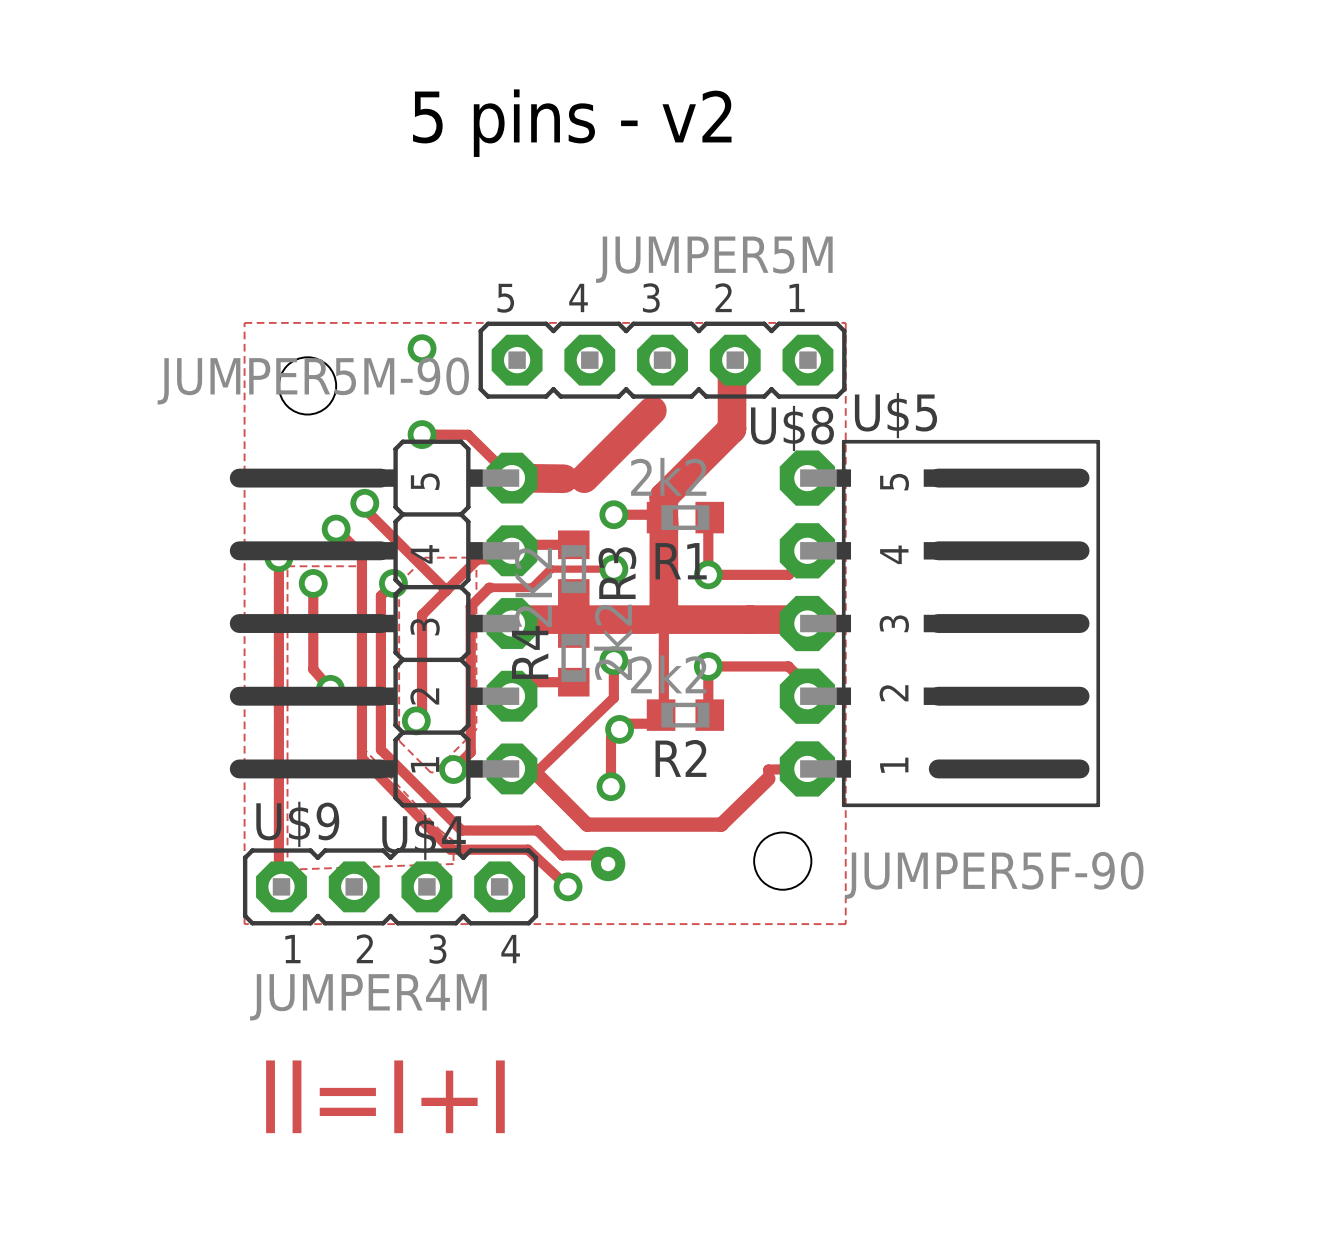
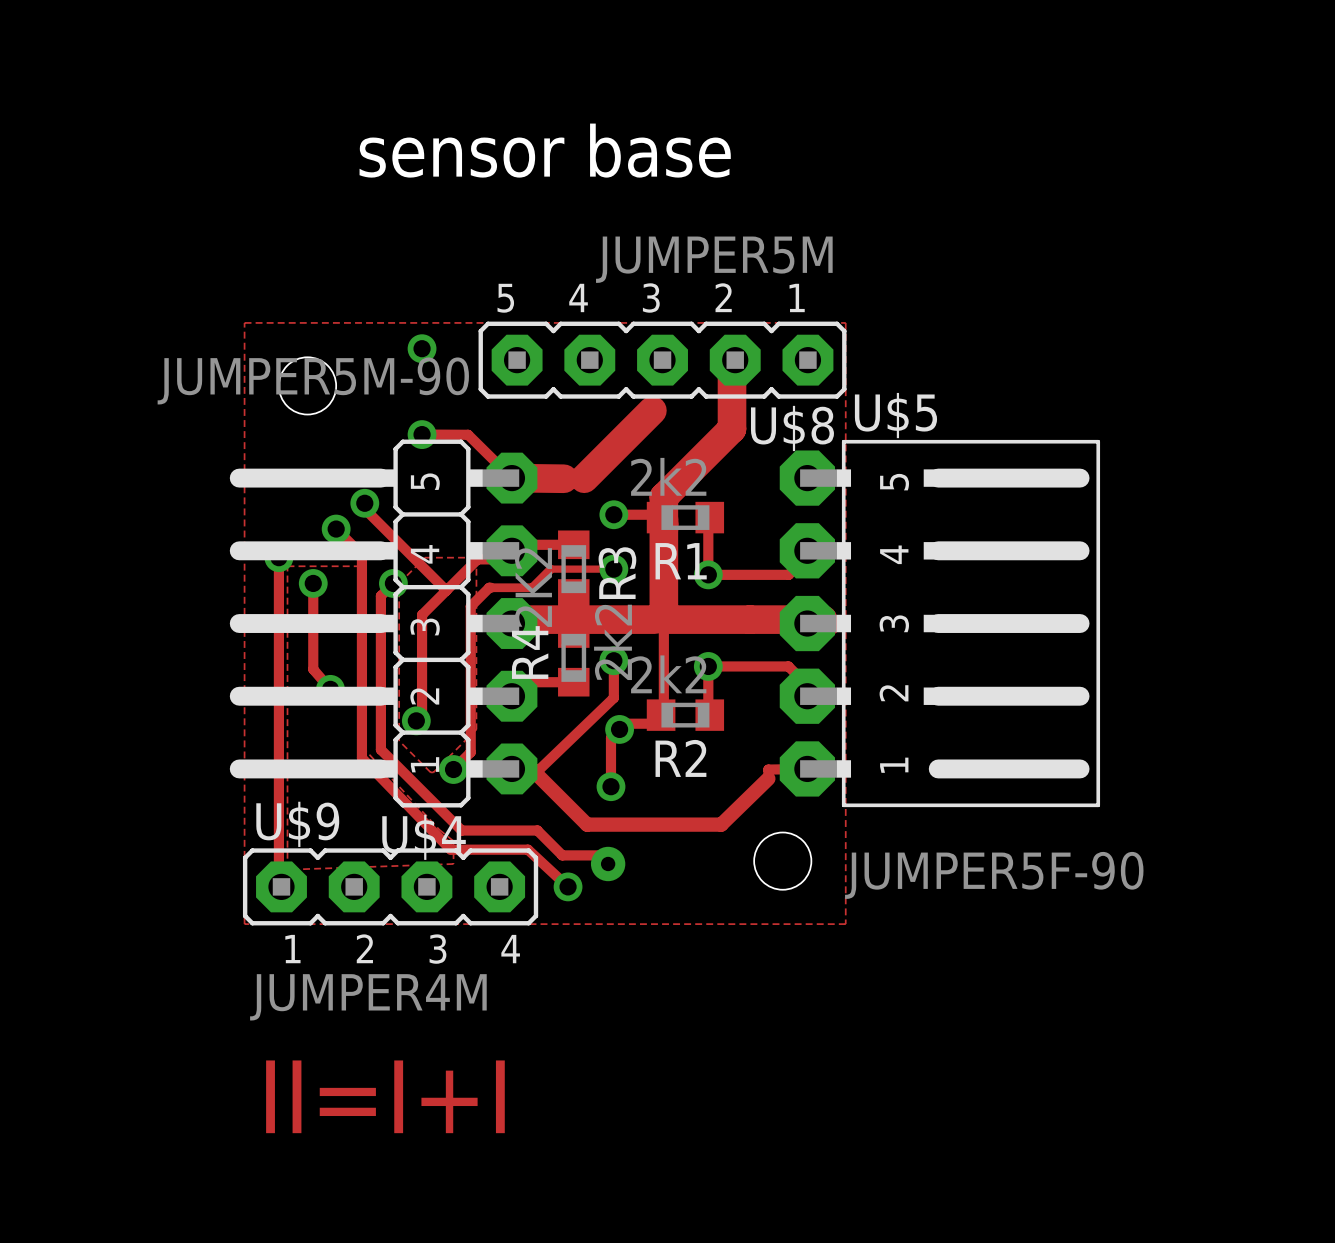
text: 5 pins - v2 (572, 123) -> none
text: none -> sensor base (545, 150)

